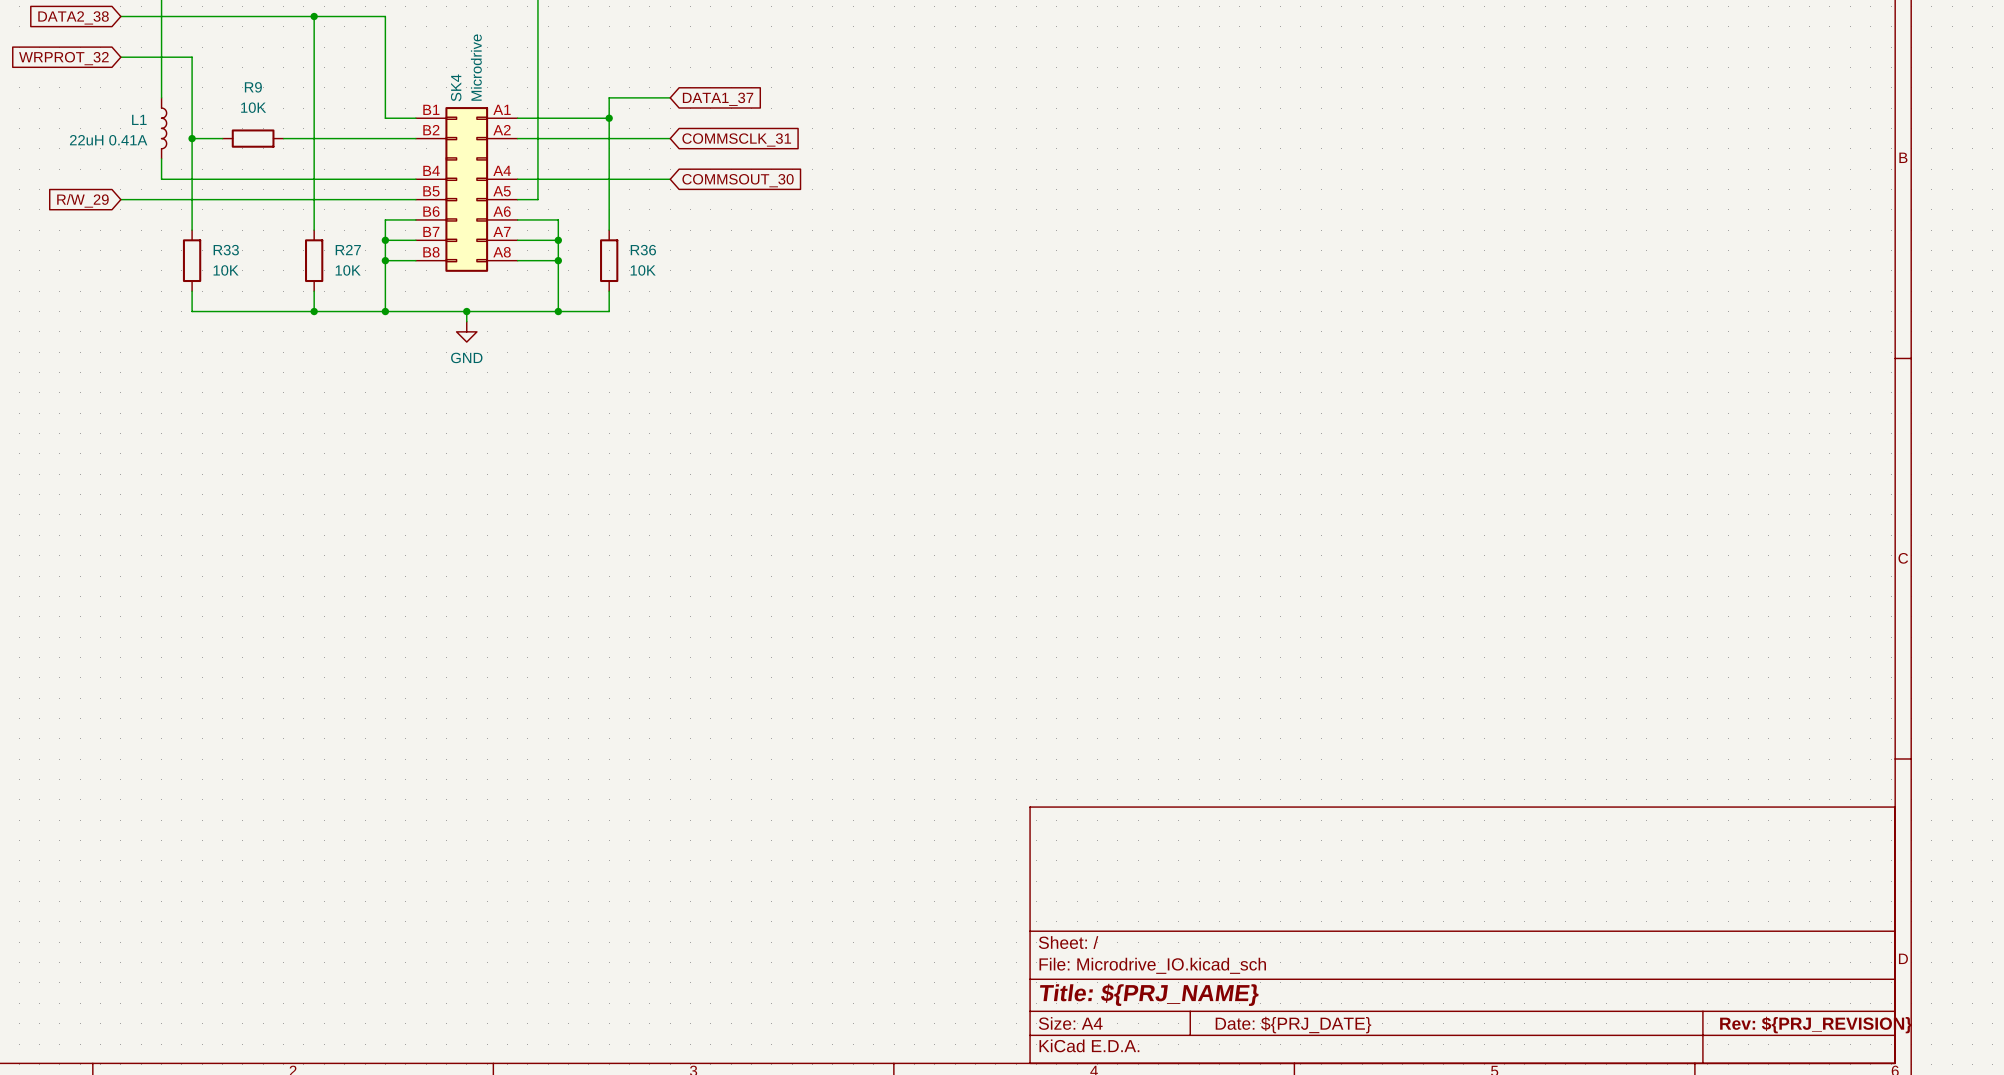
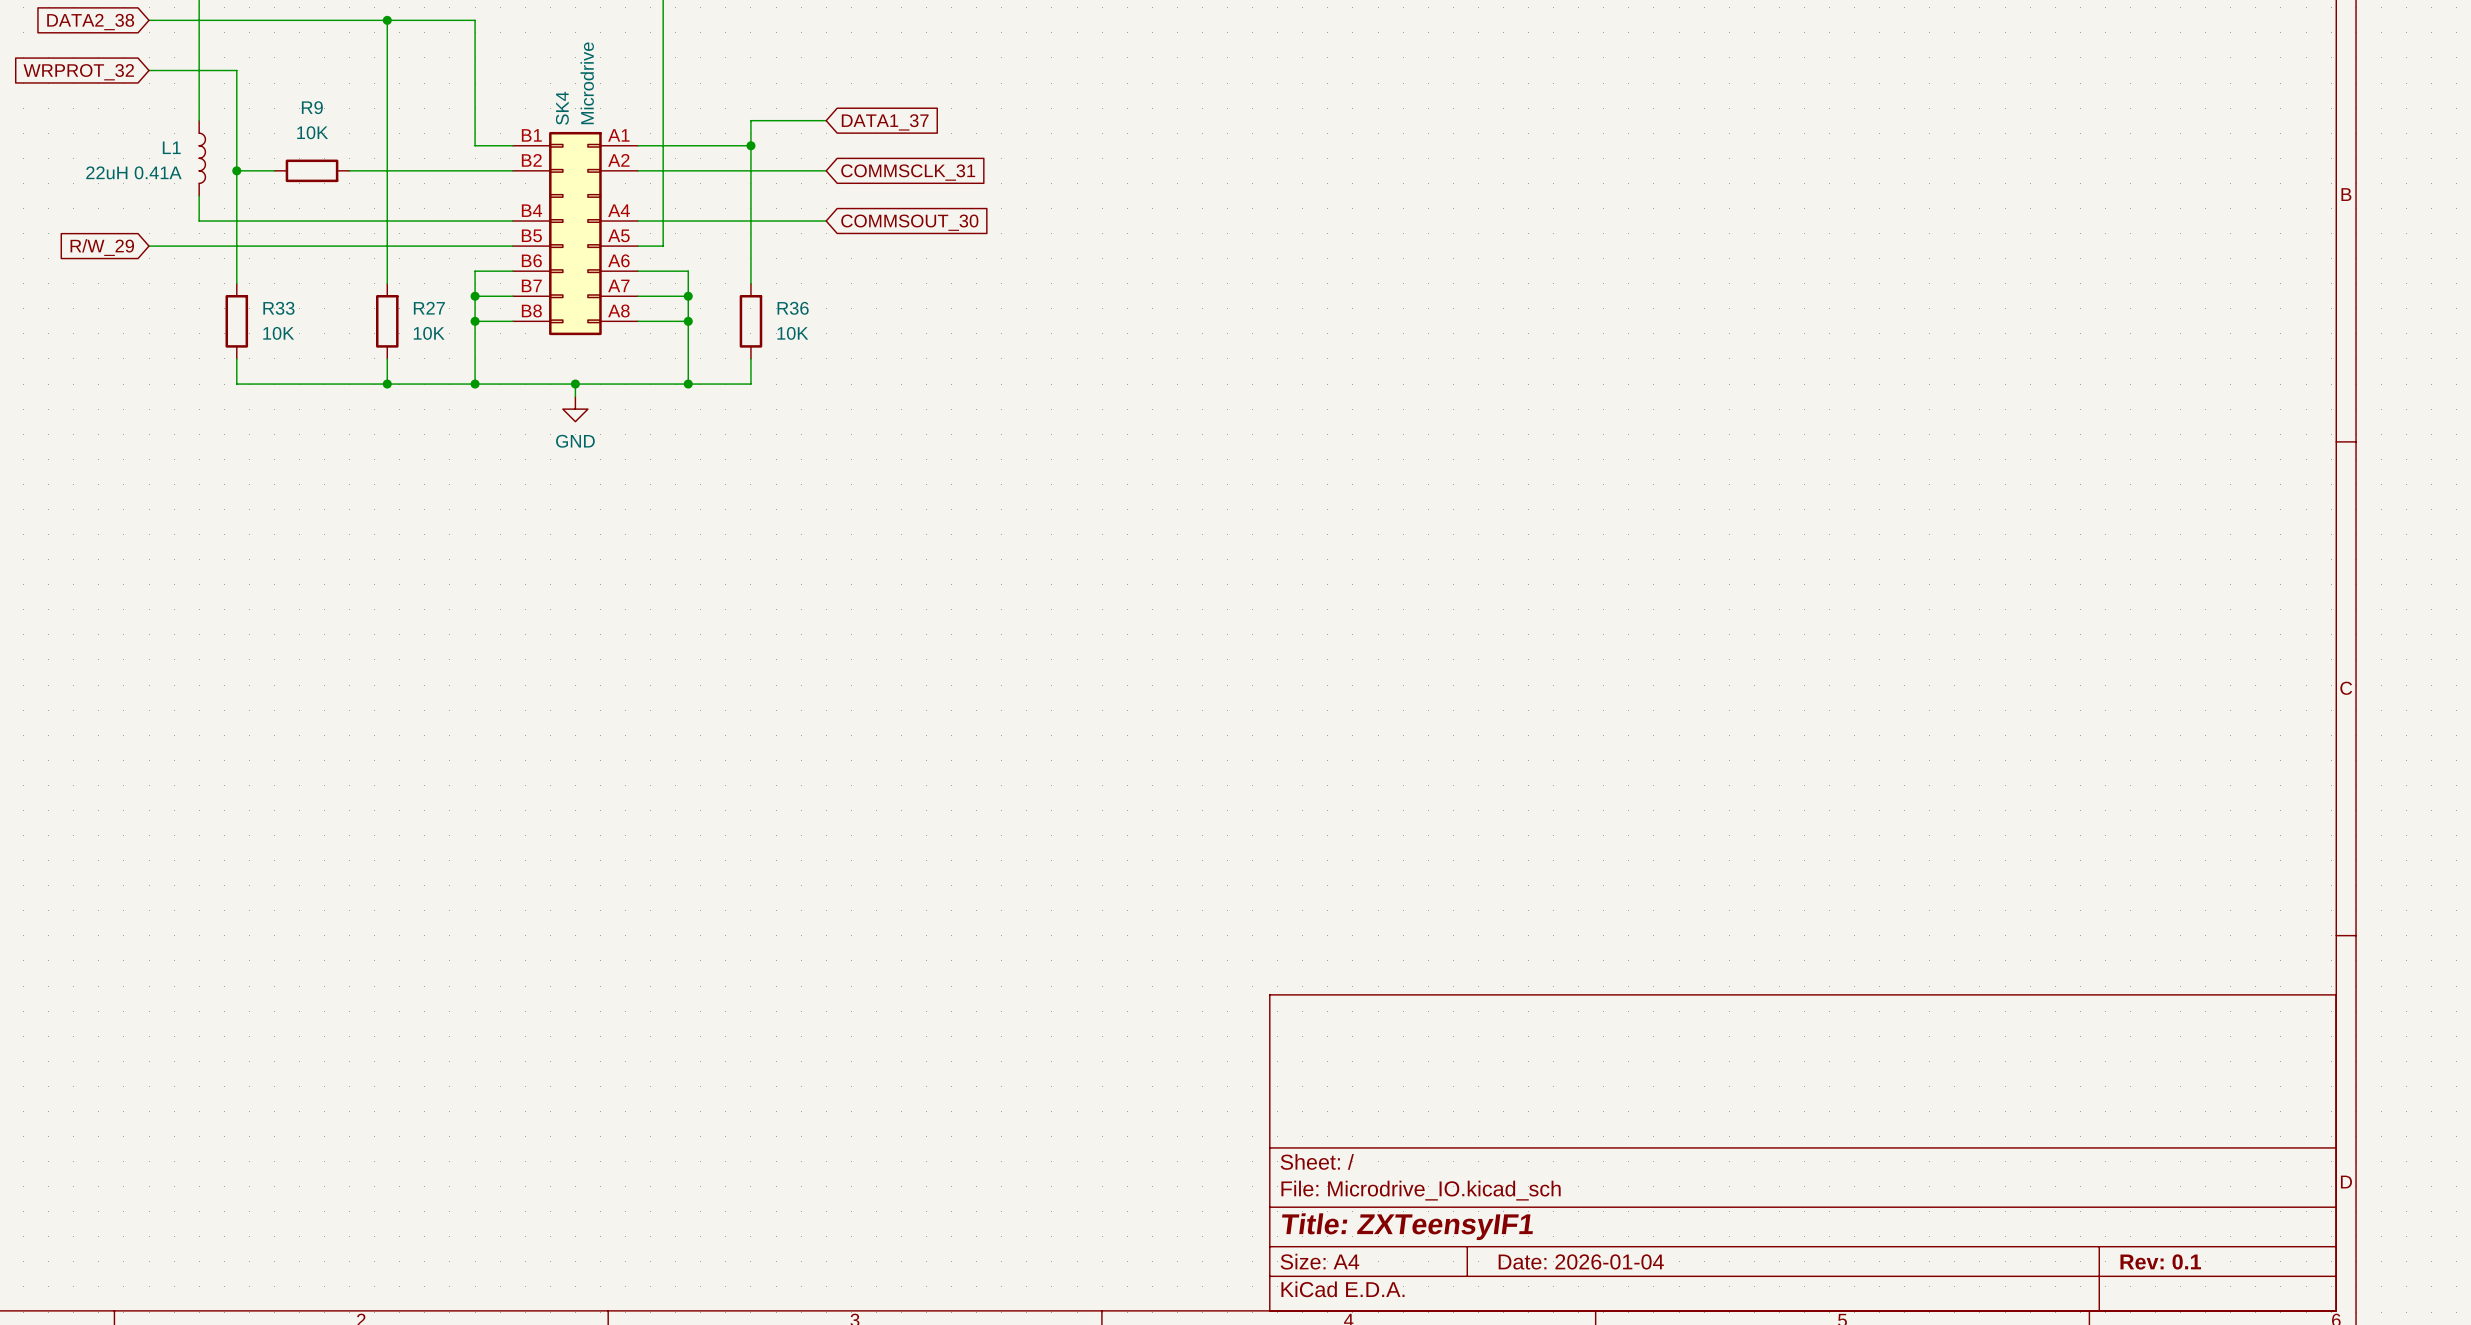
title block: Title: ${PRJ_NAME} (1149, 994) -> Title: ZXTeensyIF1 (1407, 1226)
title block: Date: ${PRJ_DATE} (1293, 1025) -> Date: 2026-01-04 (1581, 1261)
title block: Rev: ${PRJ_REVISION} (1815, 1025) -> Rev: 0.1 (2160, 1261)

